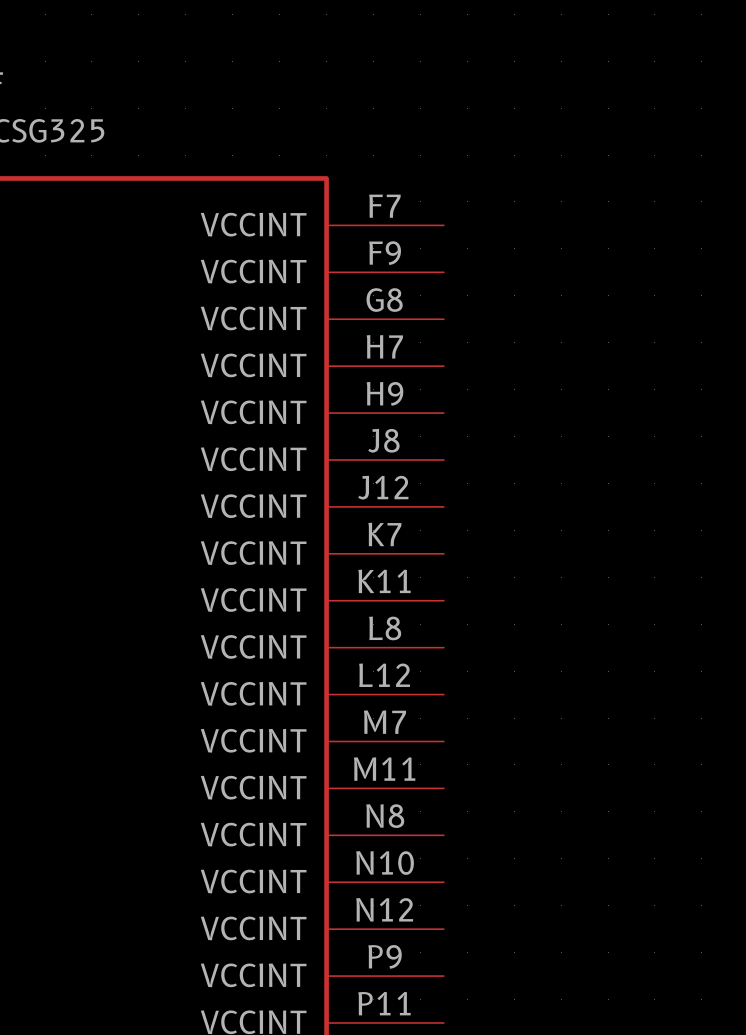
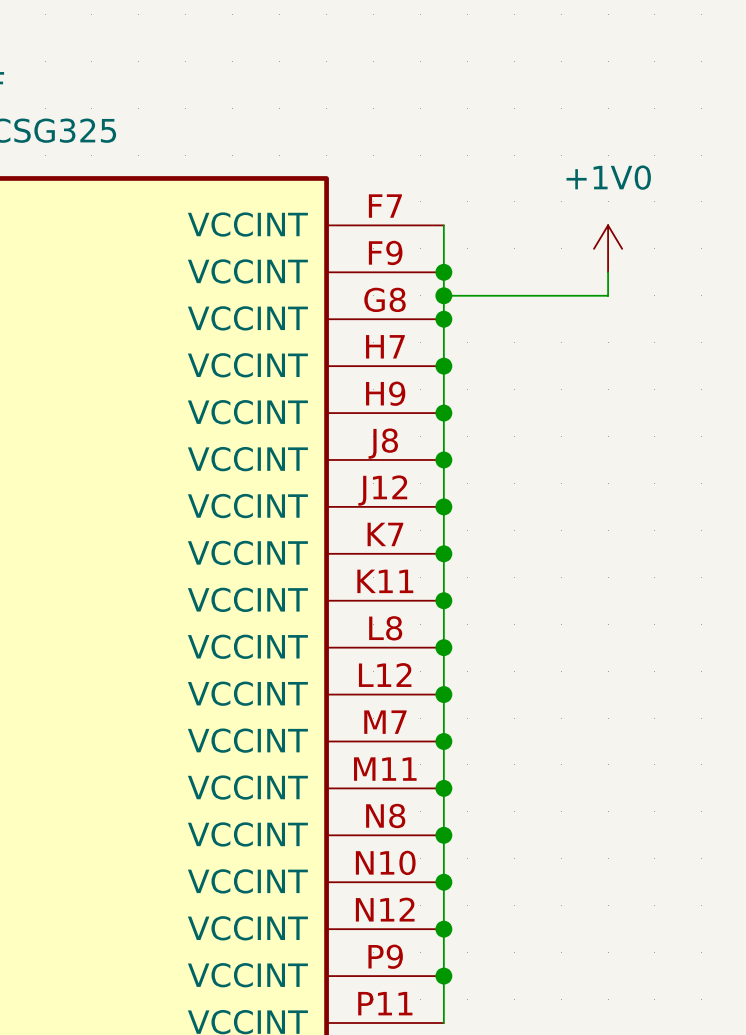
wire: none -> (443, 225) (443, 1022)
power symbol: none -> +1V0 (608, 248)
junction: none -> (443, 272)
wire: none -> (608, 272) (608, 295) (443, 295)
junction: none -> (443, 295)
junction: none -> (443, 319)
junction: none -> (443, 366)
junction: none -> (443, 413)
junction: none -> (443, 459)
junction: none -> (443, 506)
junction: none -> (443, 553)
junction: none -> (443, 600)
junction: none -> (443, 647)
junction: none -> (443, 694)
junction: none -> (443, 741)
junction: none -> (443, 788)
junction: none -> (443, 835)
junction: none -> (443, 882)
junction: none -> (443, 929)
junction: none -> (443, 976)

